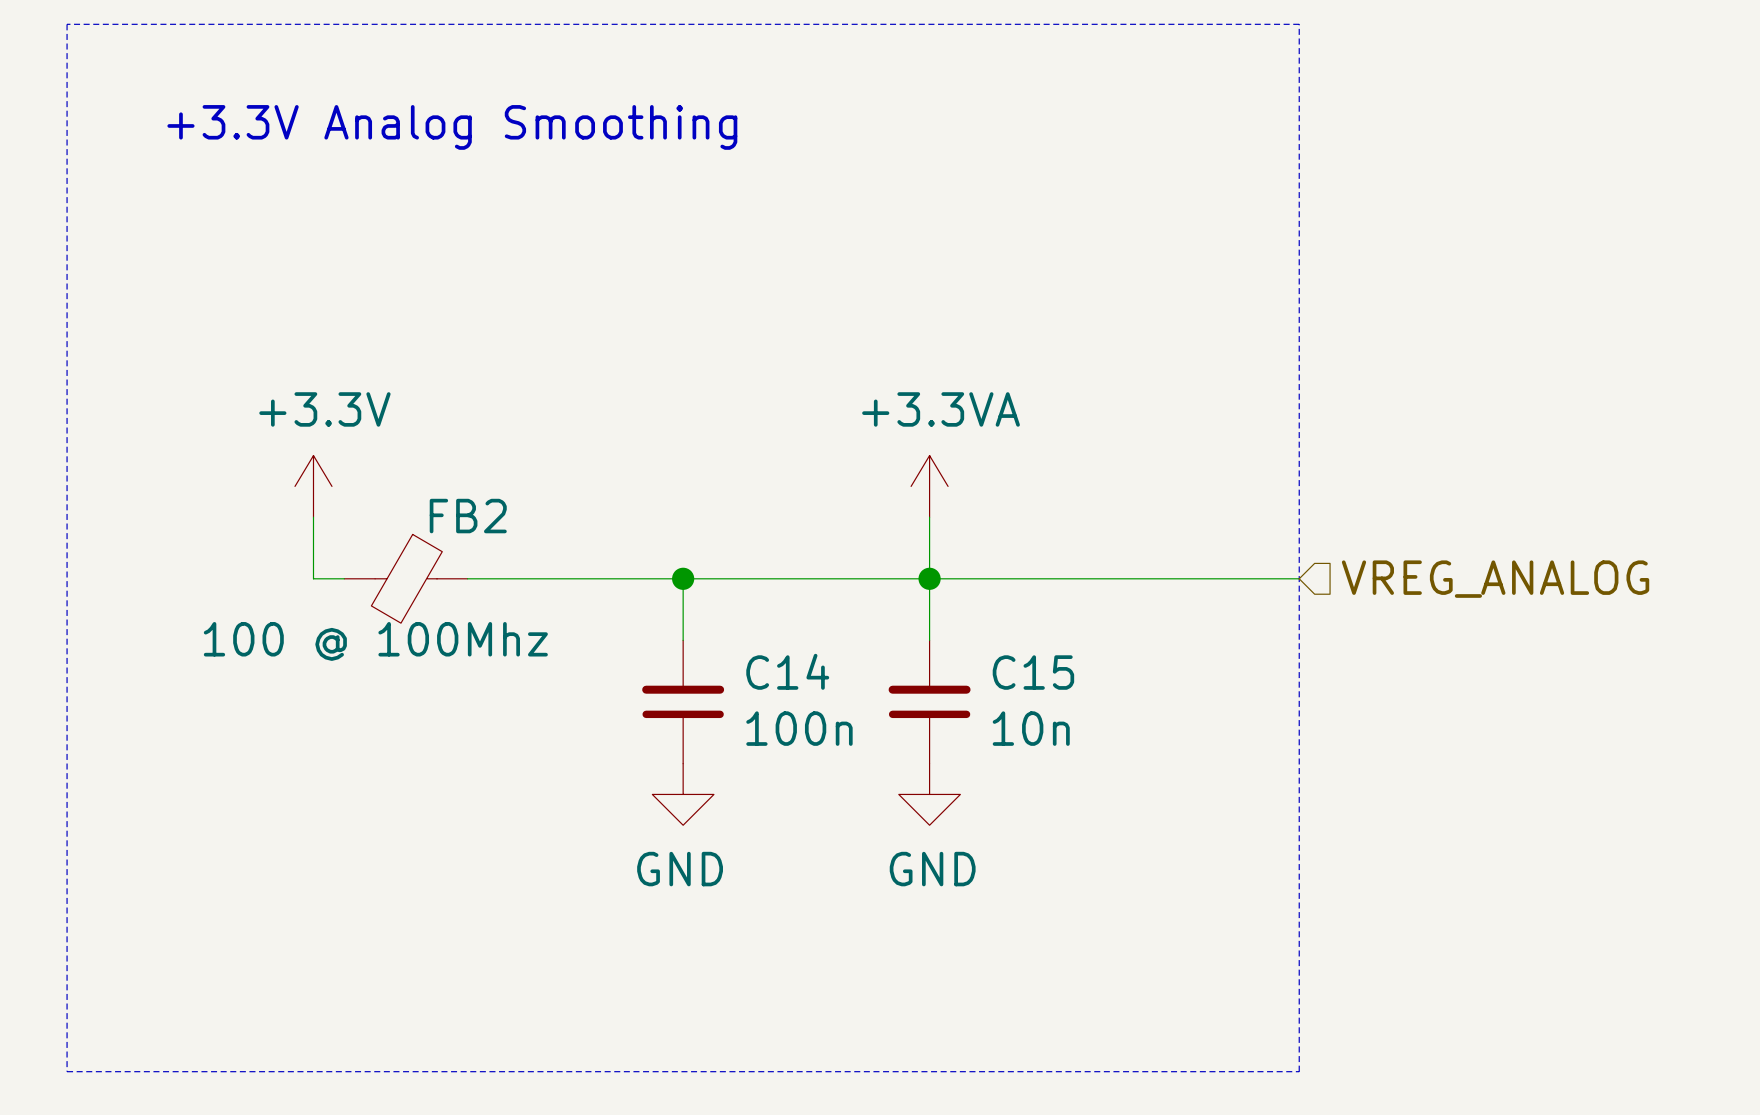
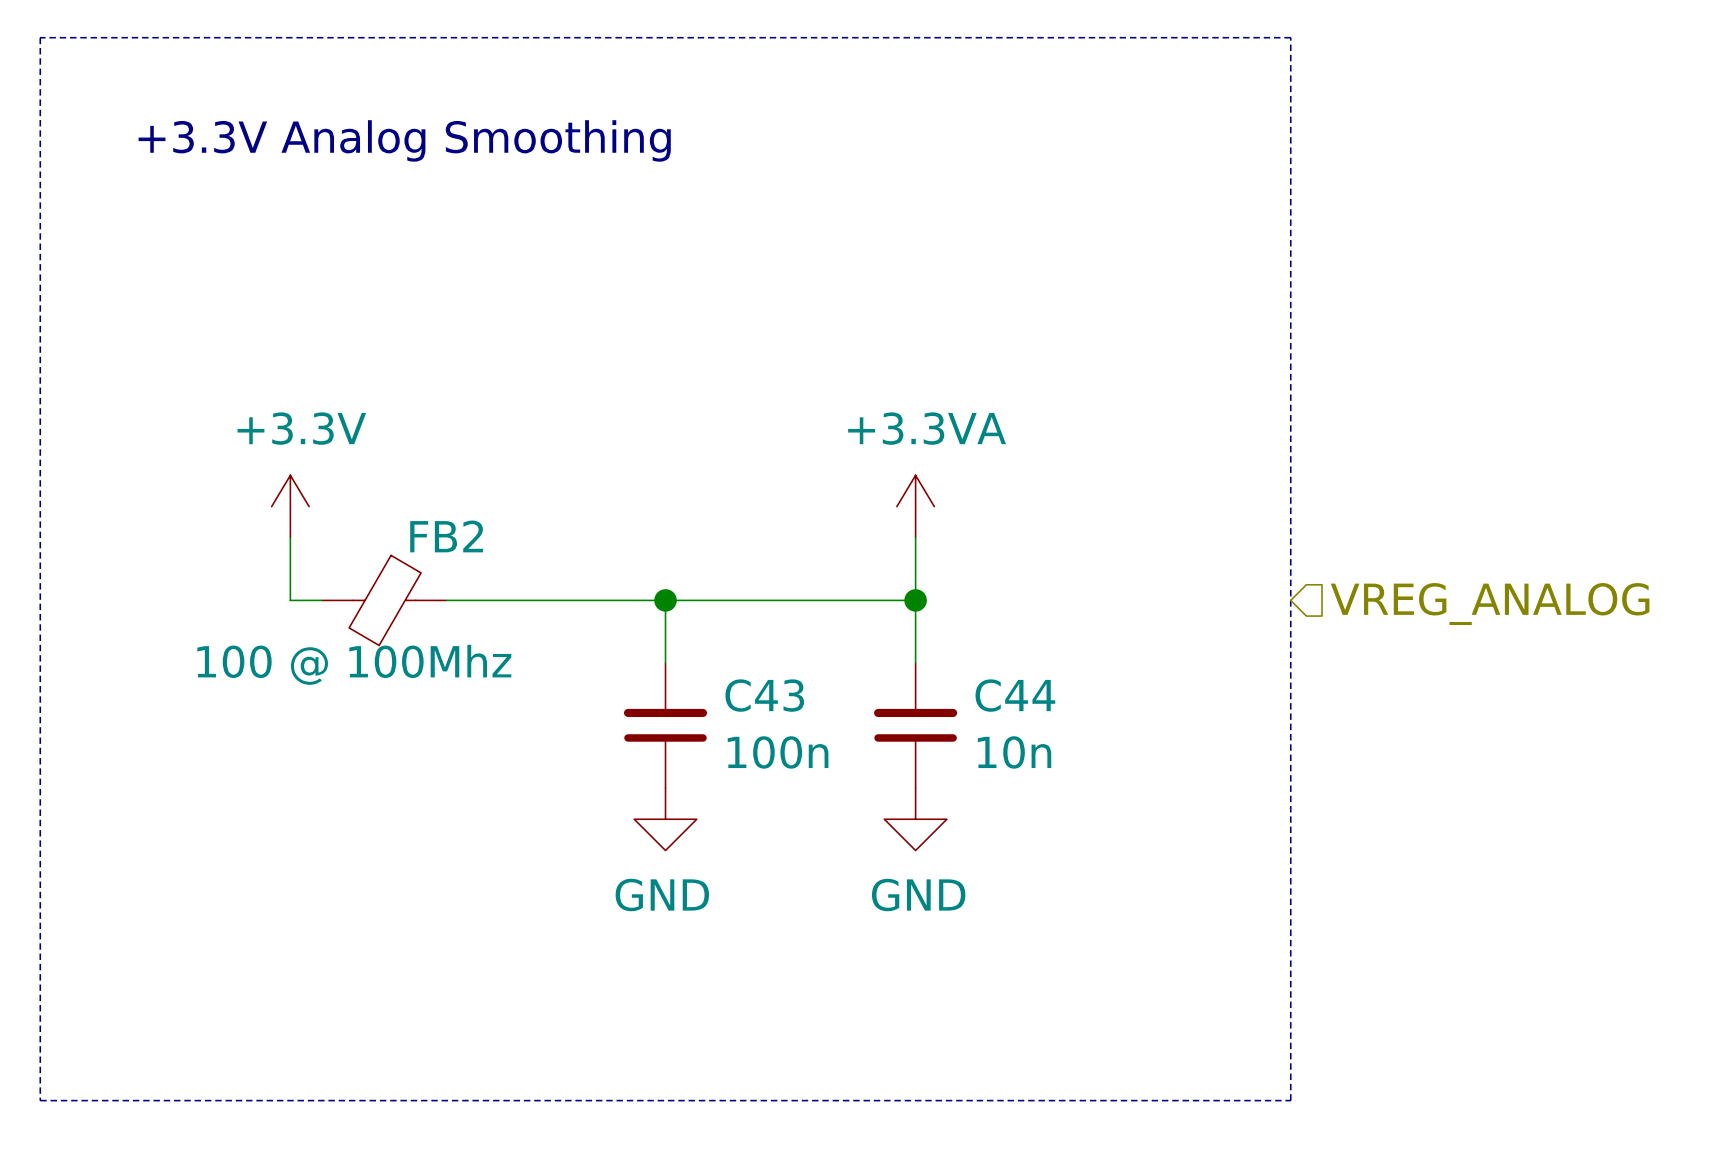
wire: (929, 578) (1299, 578) -> none
C14 name: C14 (787, 671) -> C43 (764, 695)
C15 name: C15 (1033, 672) -> C44 (1015, 695)

